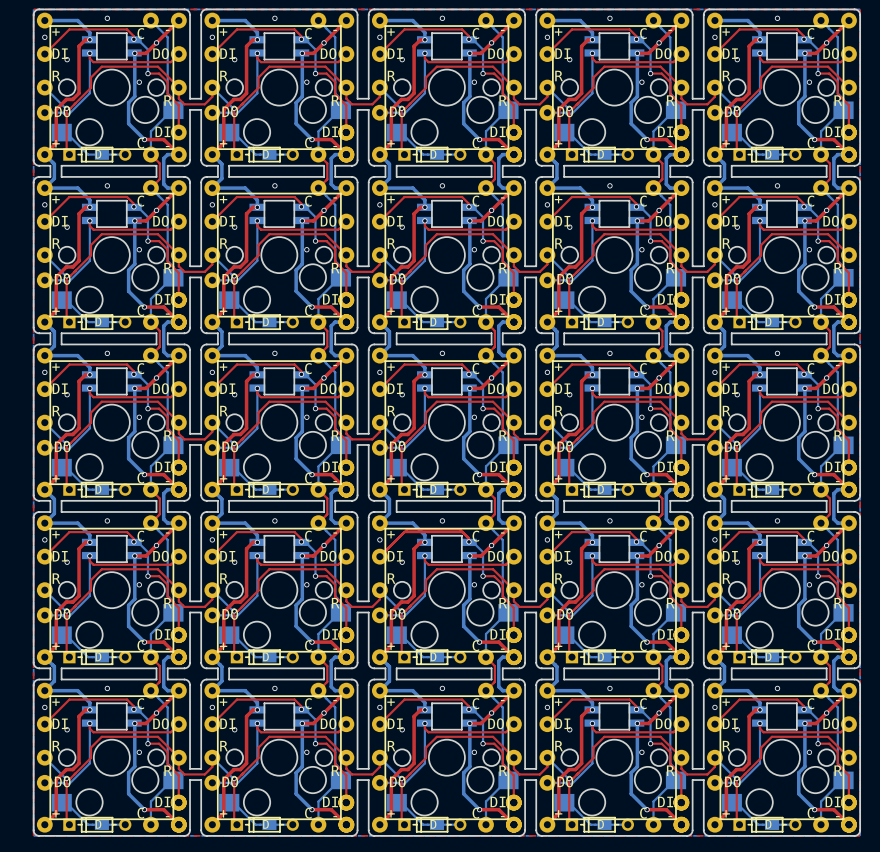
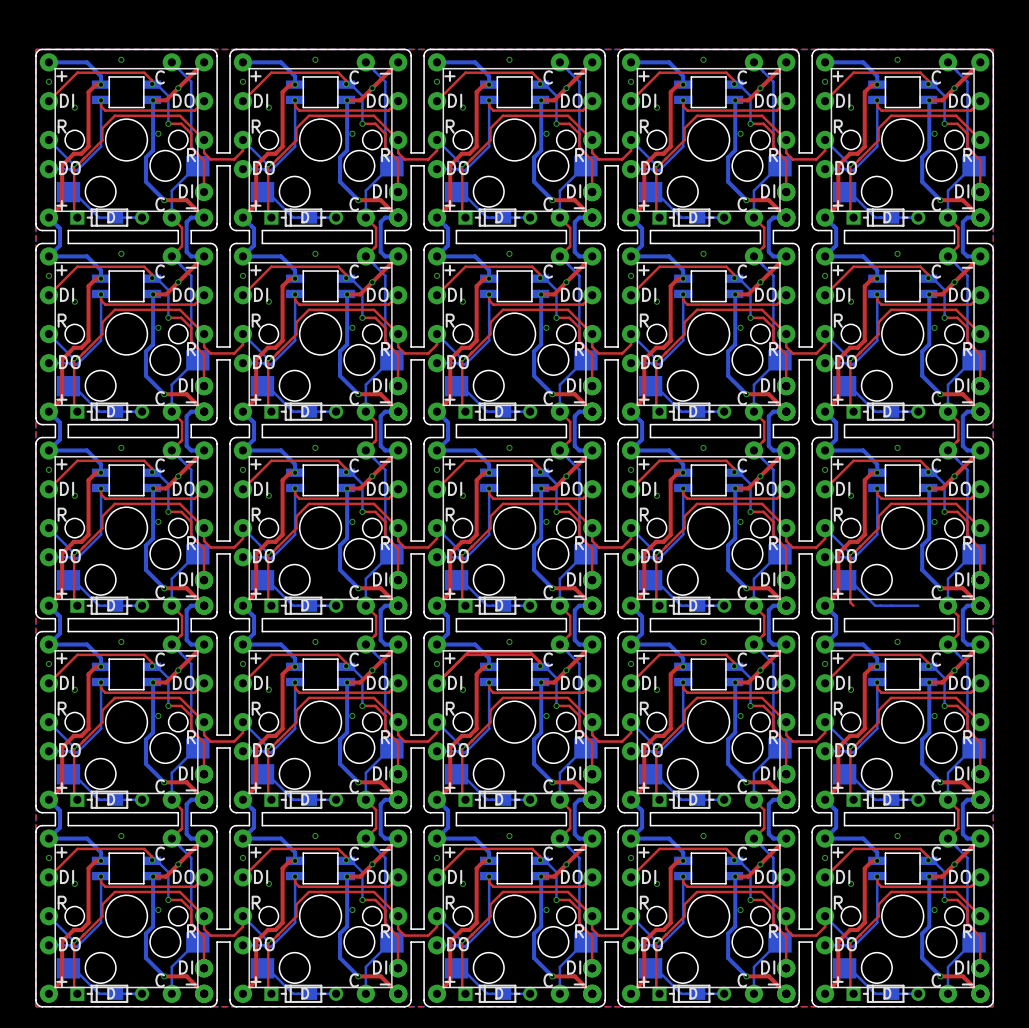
D: (767, 489) -> none

